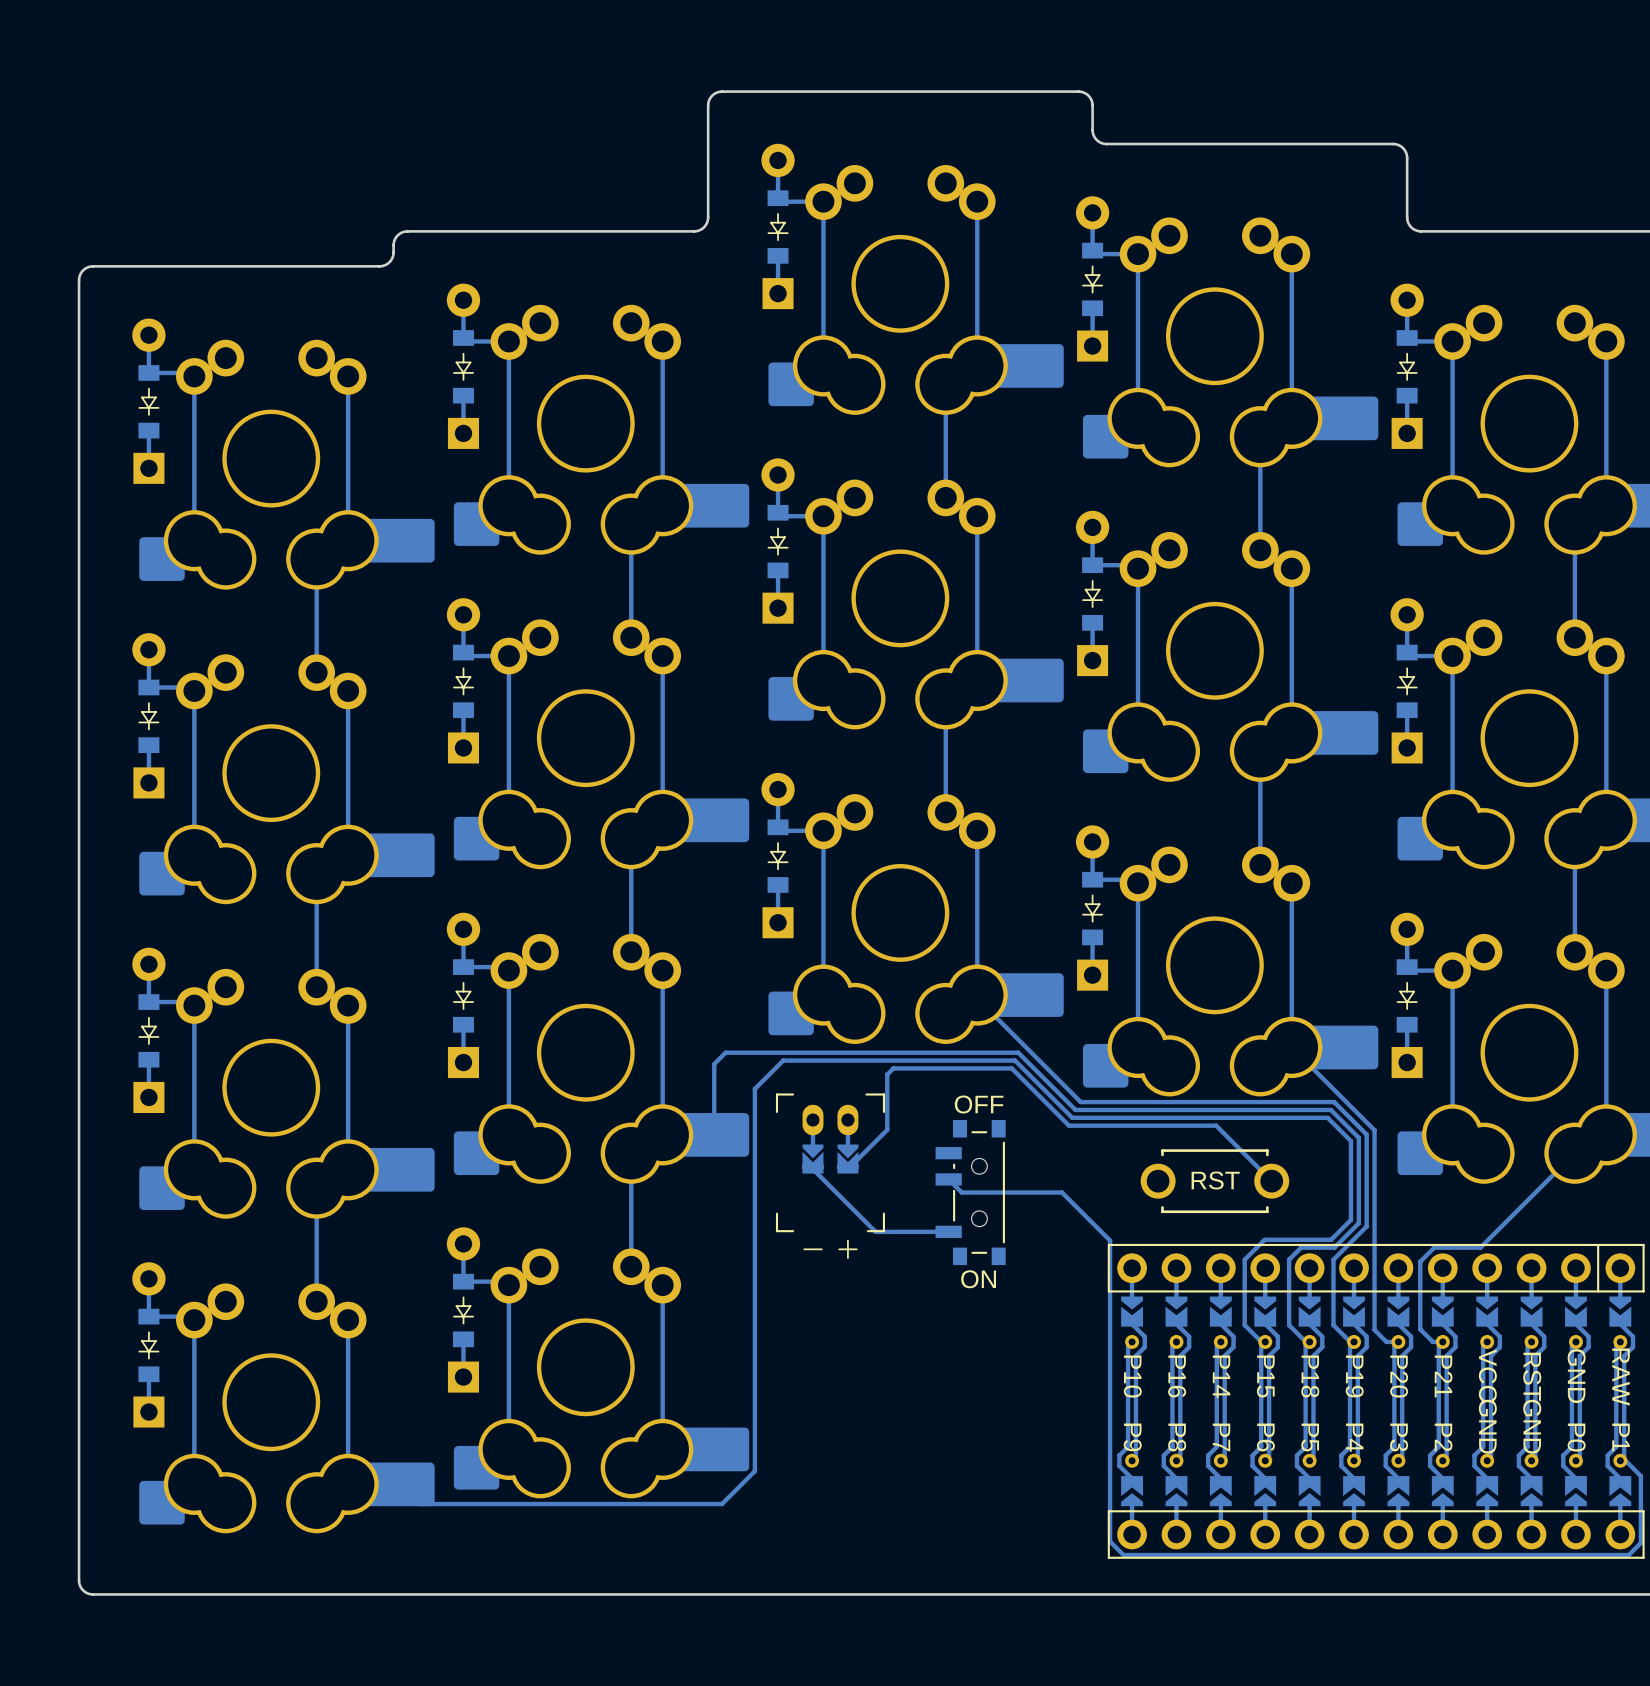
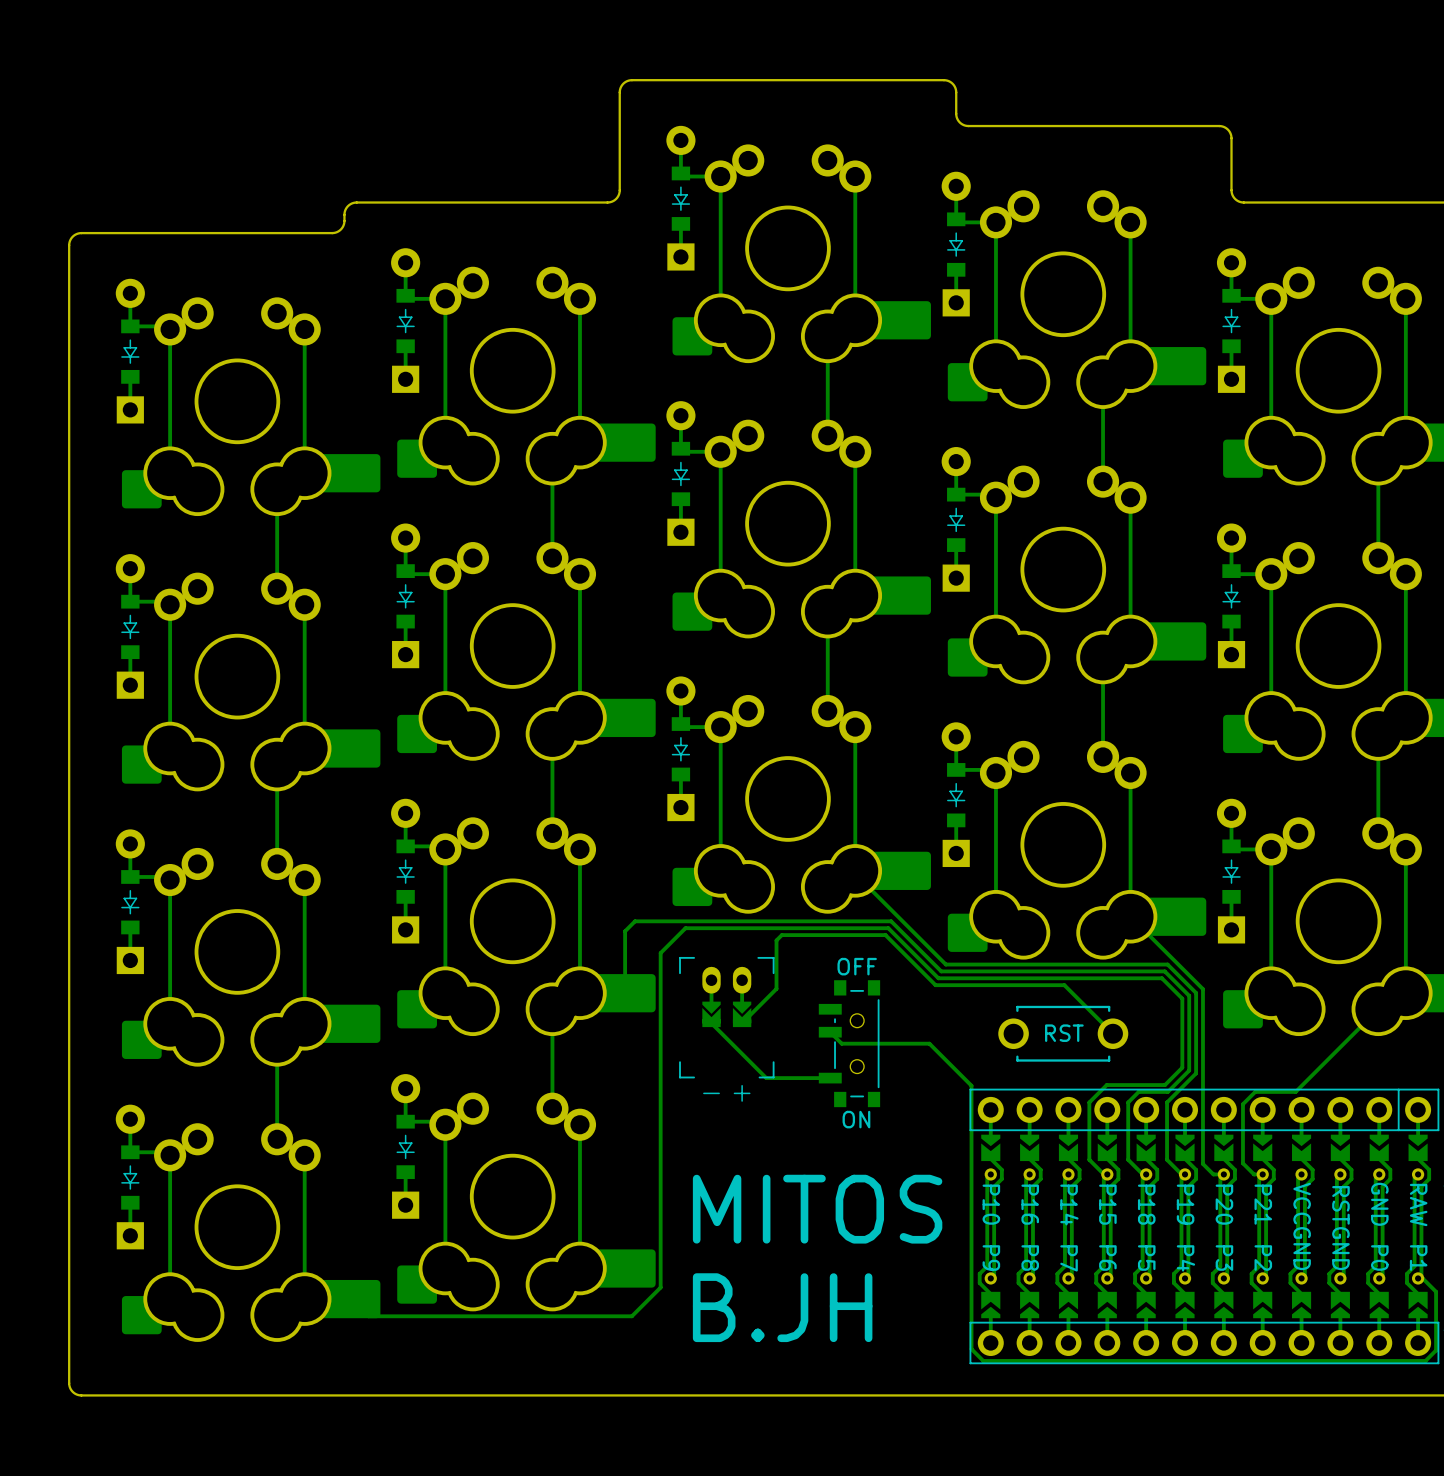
text: none -> MITOS (817, 1209)
text: none -> B.JH (782, 1307)

